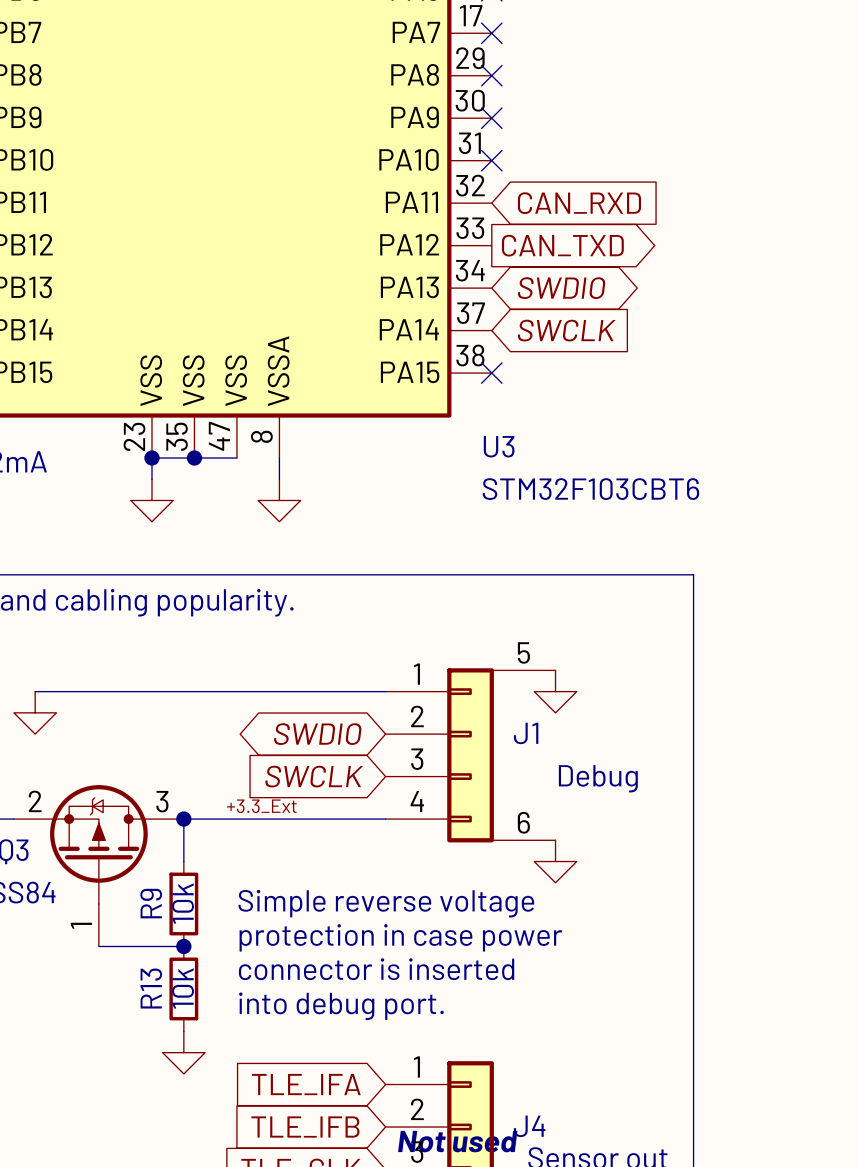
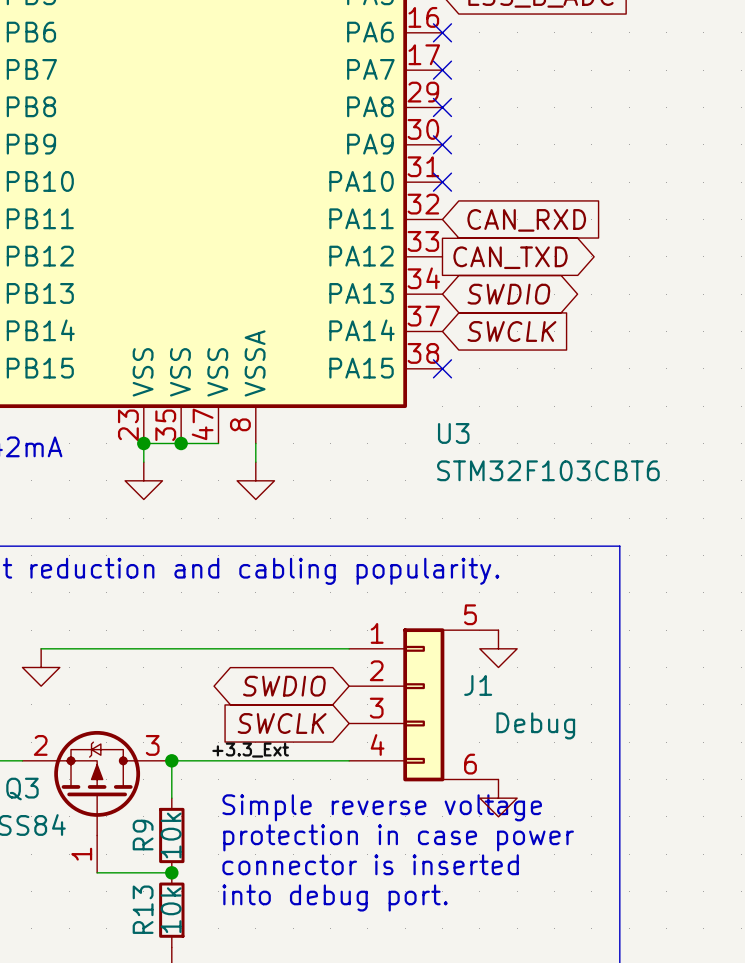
text: none -> Simple reverse voltage (382, 807)
text: Simple reverse voltage (386, 903) -> protection in case power (398, 837)
text: protection in case power (400, 937) -> connector is inserted (370, 864)
text: connector is inserted (376, 969) -> into debug port. (335, 897)
text: into debug port. (341, 1006) -> none

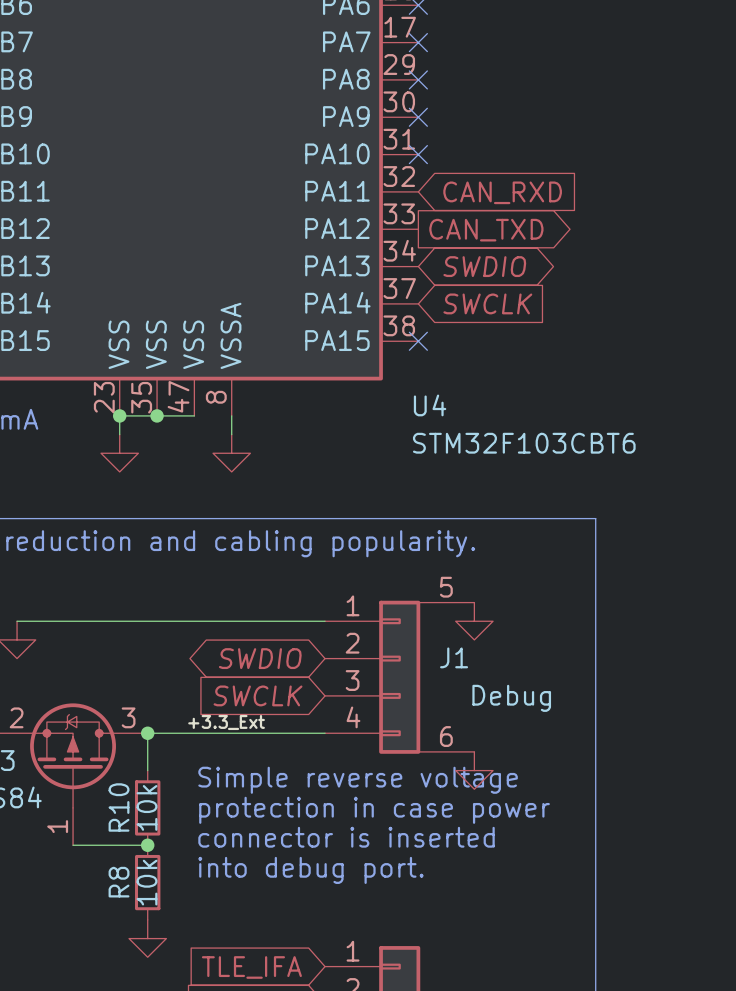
U3 name: U3 (453, 433) -> U4 (430, 405)
R9 name: R9 (143, 835) -> R10 (119, 807)
R13 name: R13 (143, 909) -> R8 (119, 882)

